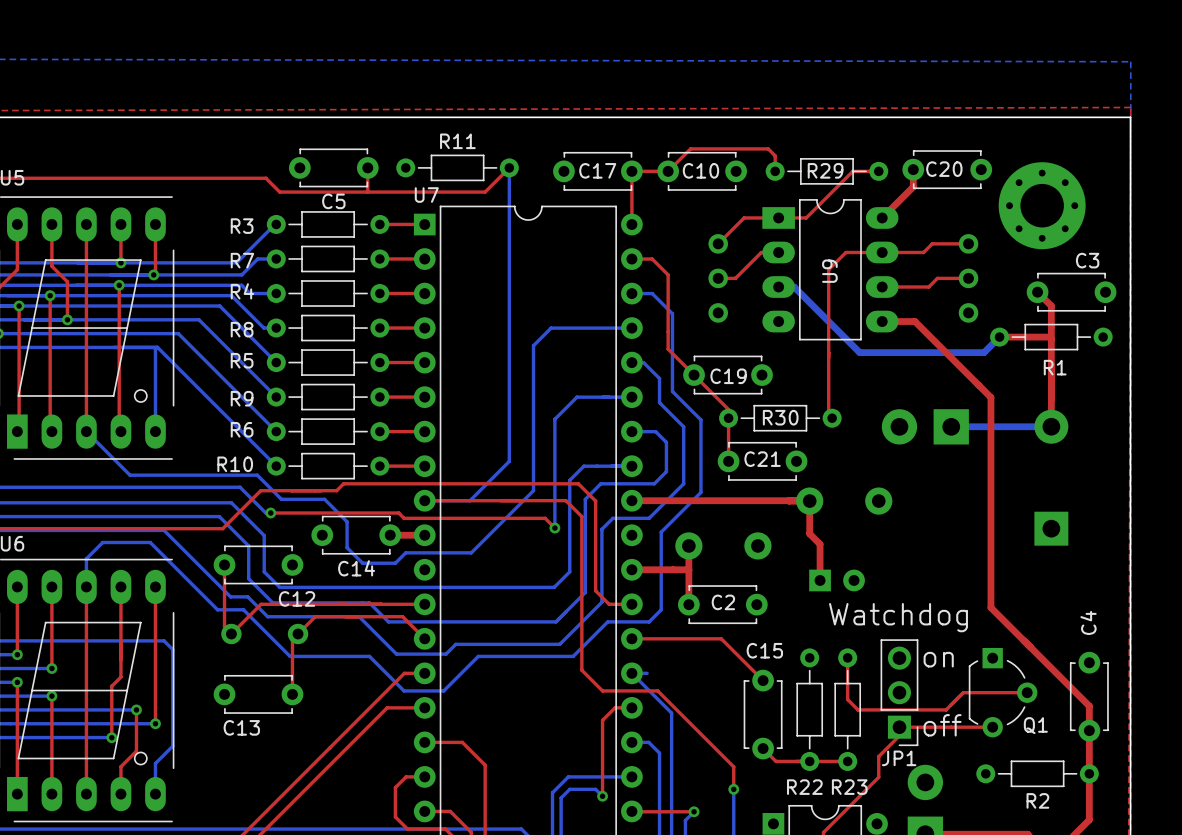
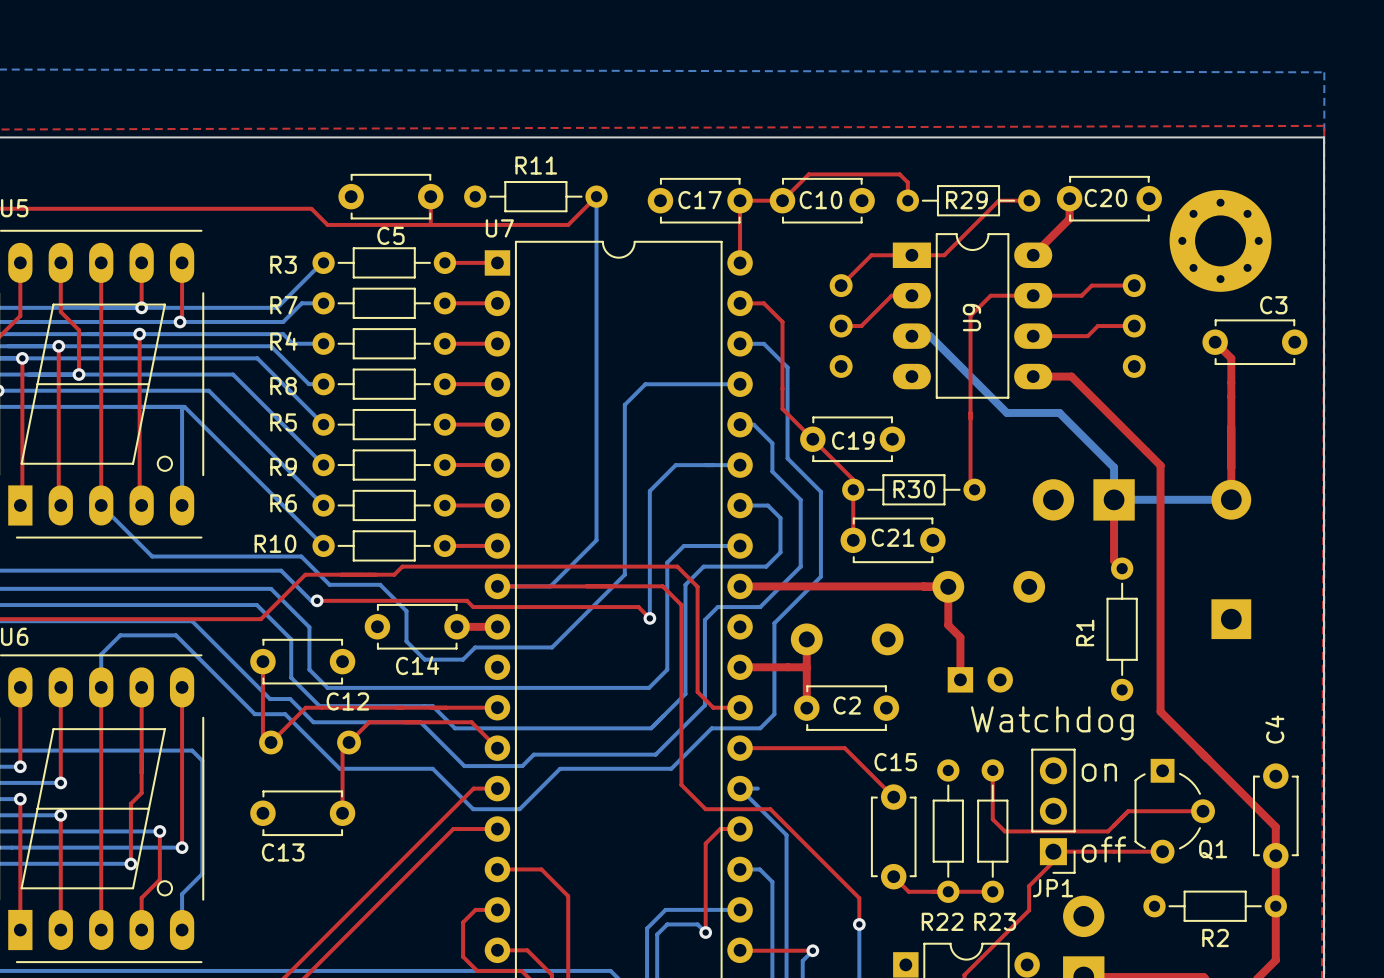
top track: (999, 337) (1049, 337) (1051, 338) -> none
bottom track: (999, 337) (984, 352) (904, 352) -> (1114, 499) (1114, 467) (1059, 412)
R1 rotation: 0° (1051, 337) -> 90° clockwise (1122, 629)
R1 position: (1051, 337) -> (1122, 629)
top track: none -> (1114, 499) (1114, 560) (1122, 568)

